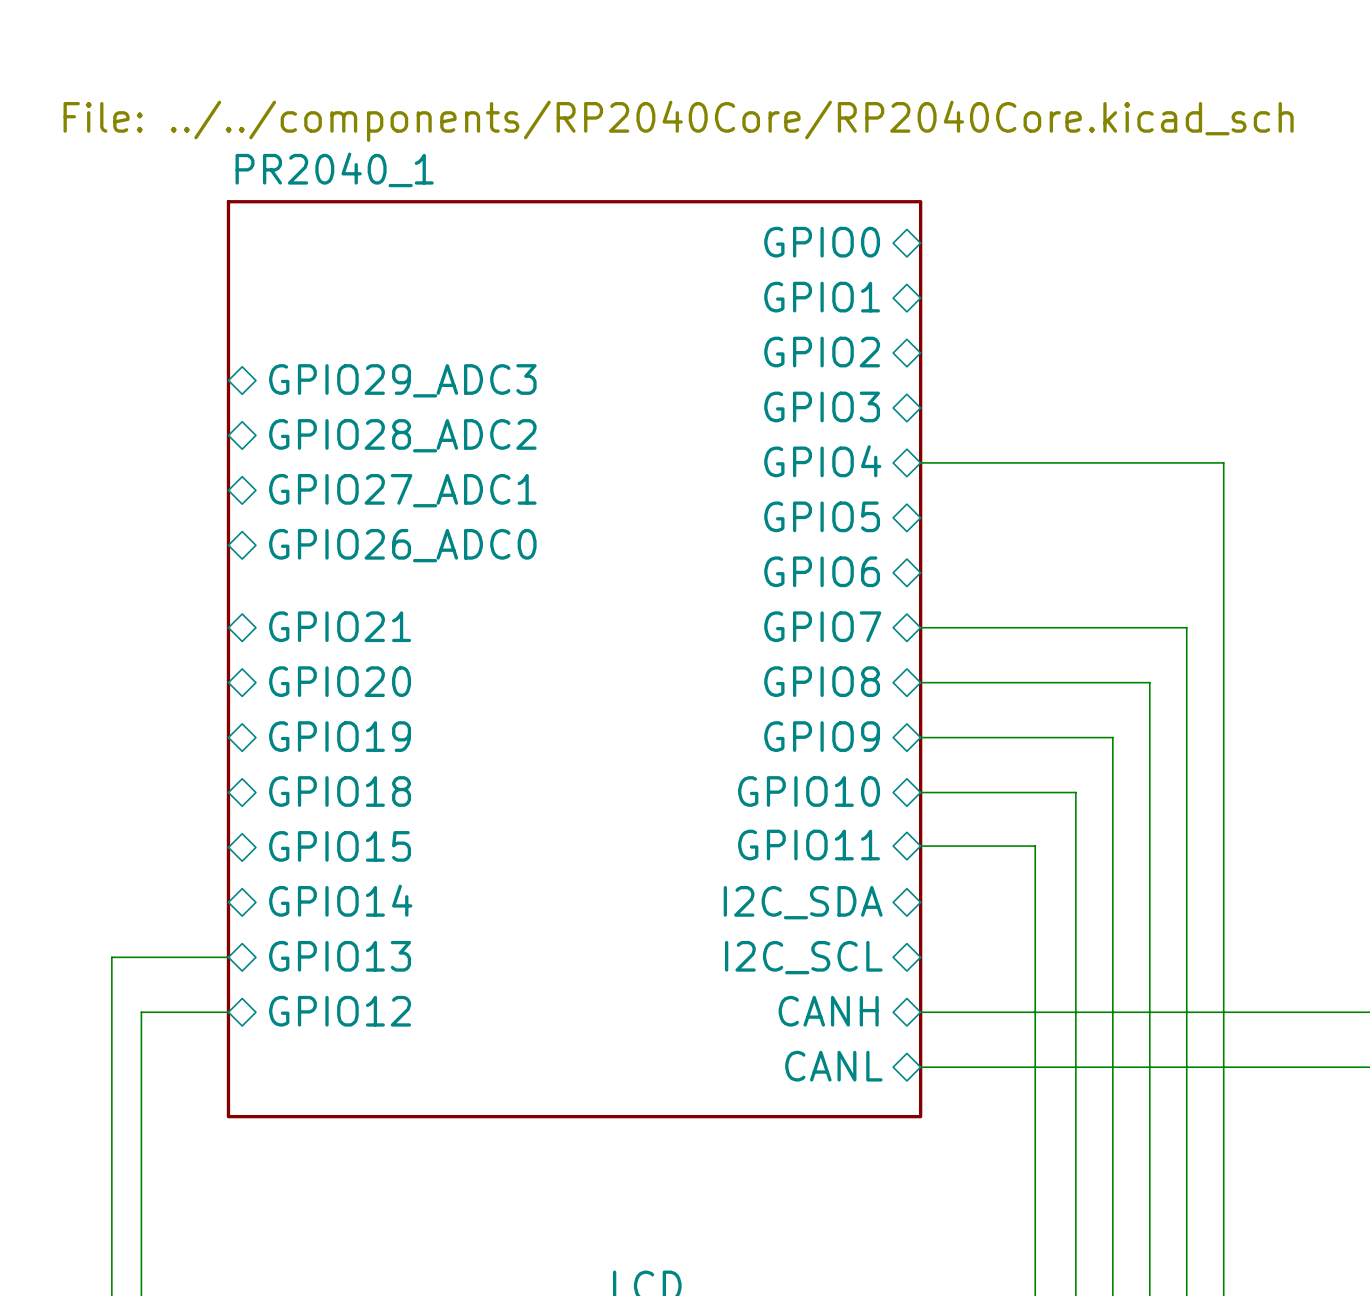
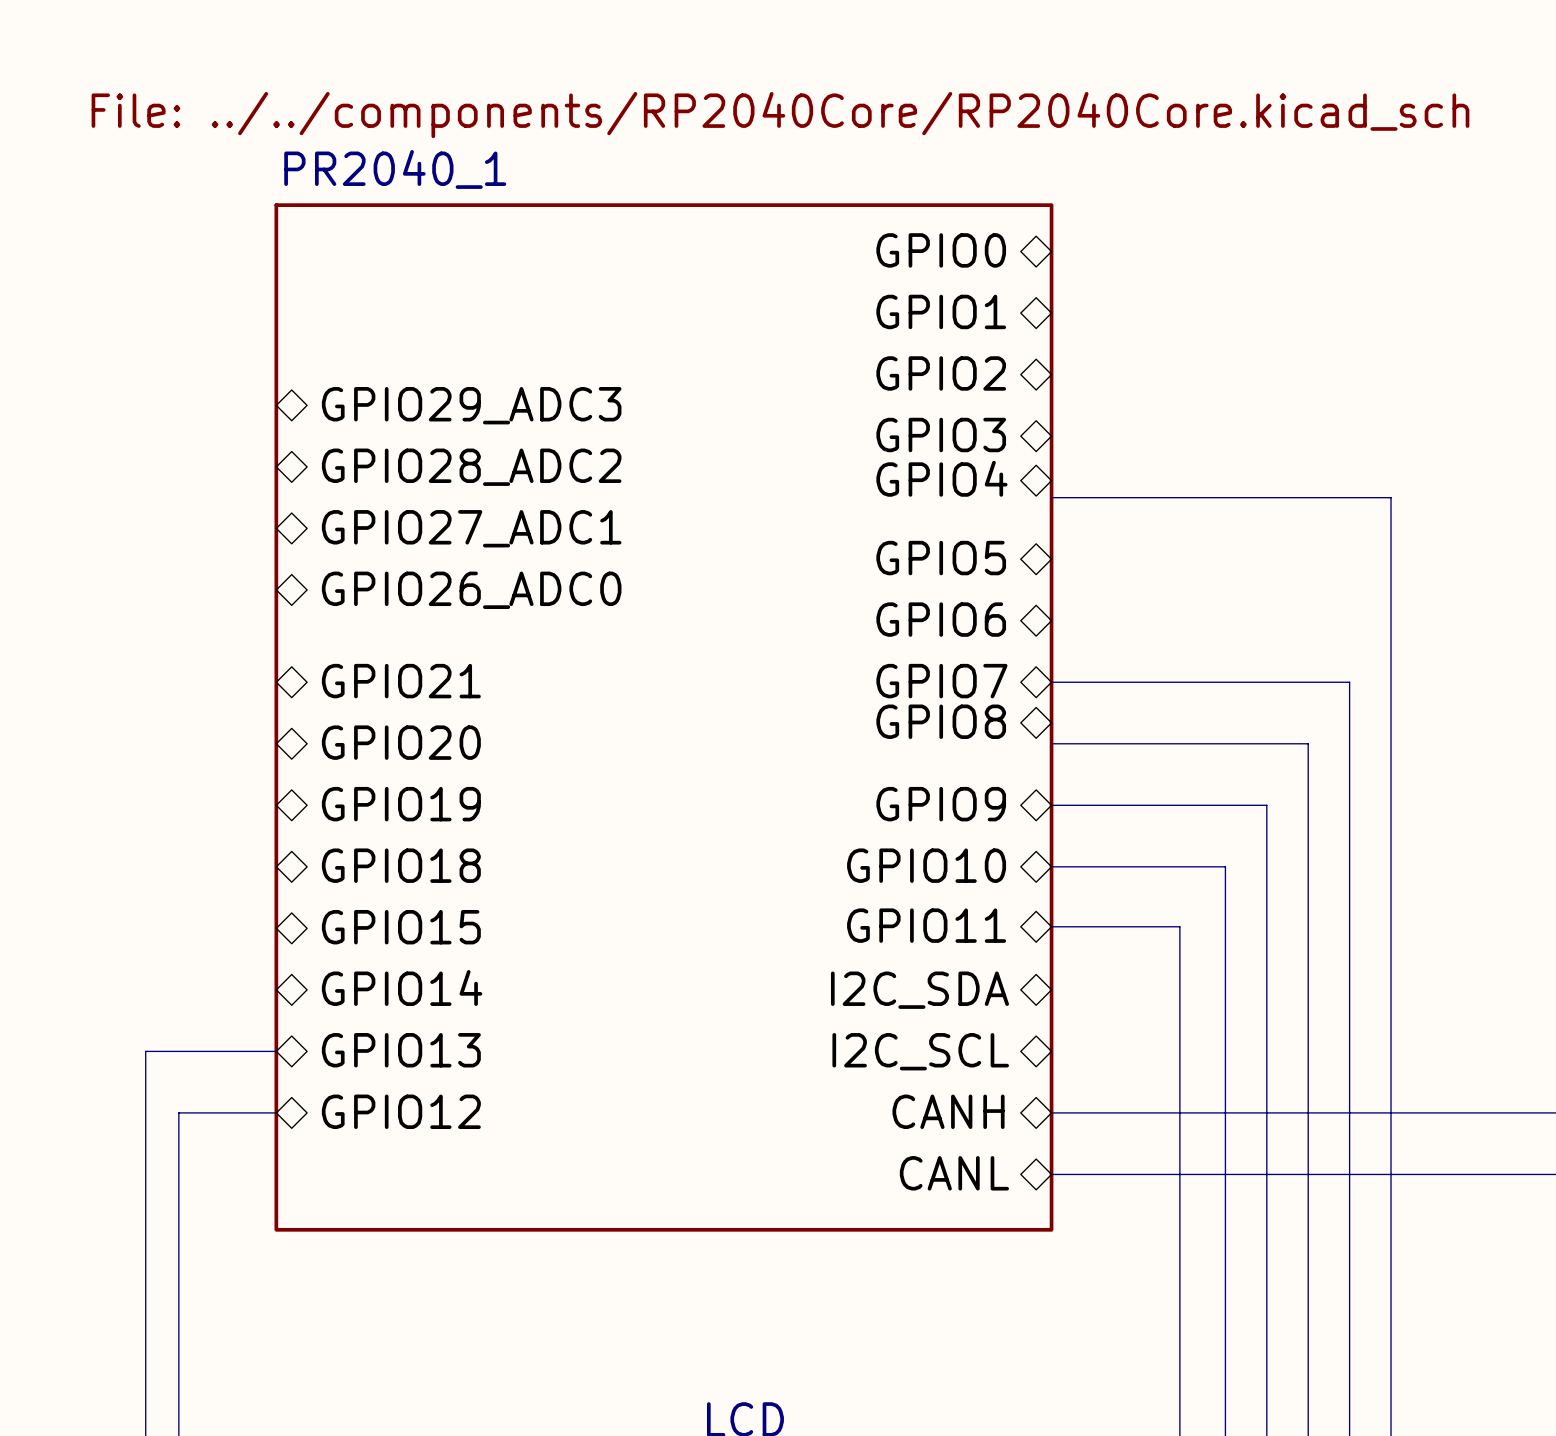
sheet pin position: GPIO4 (822, 461) -> GPIO4 (941, 478)
sheet pin position: GPIO8 (822, 681) -> GPIO8 (941, 721)

